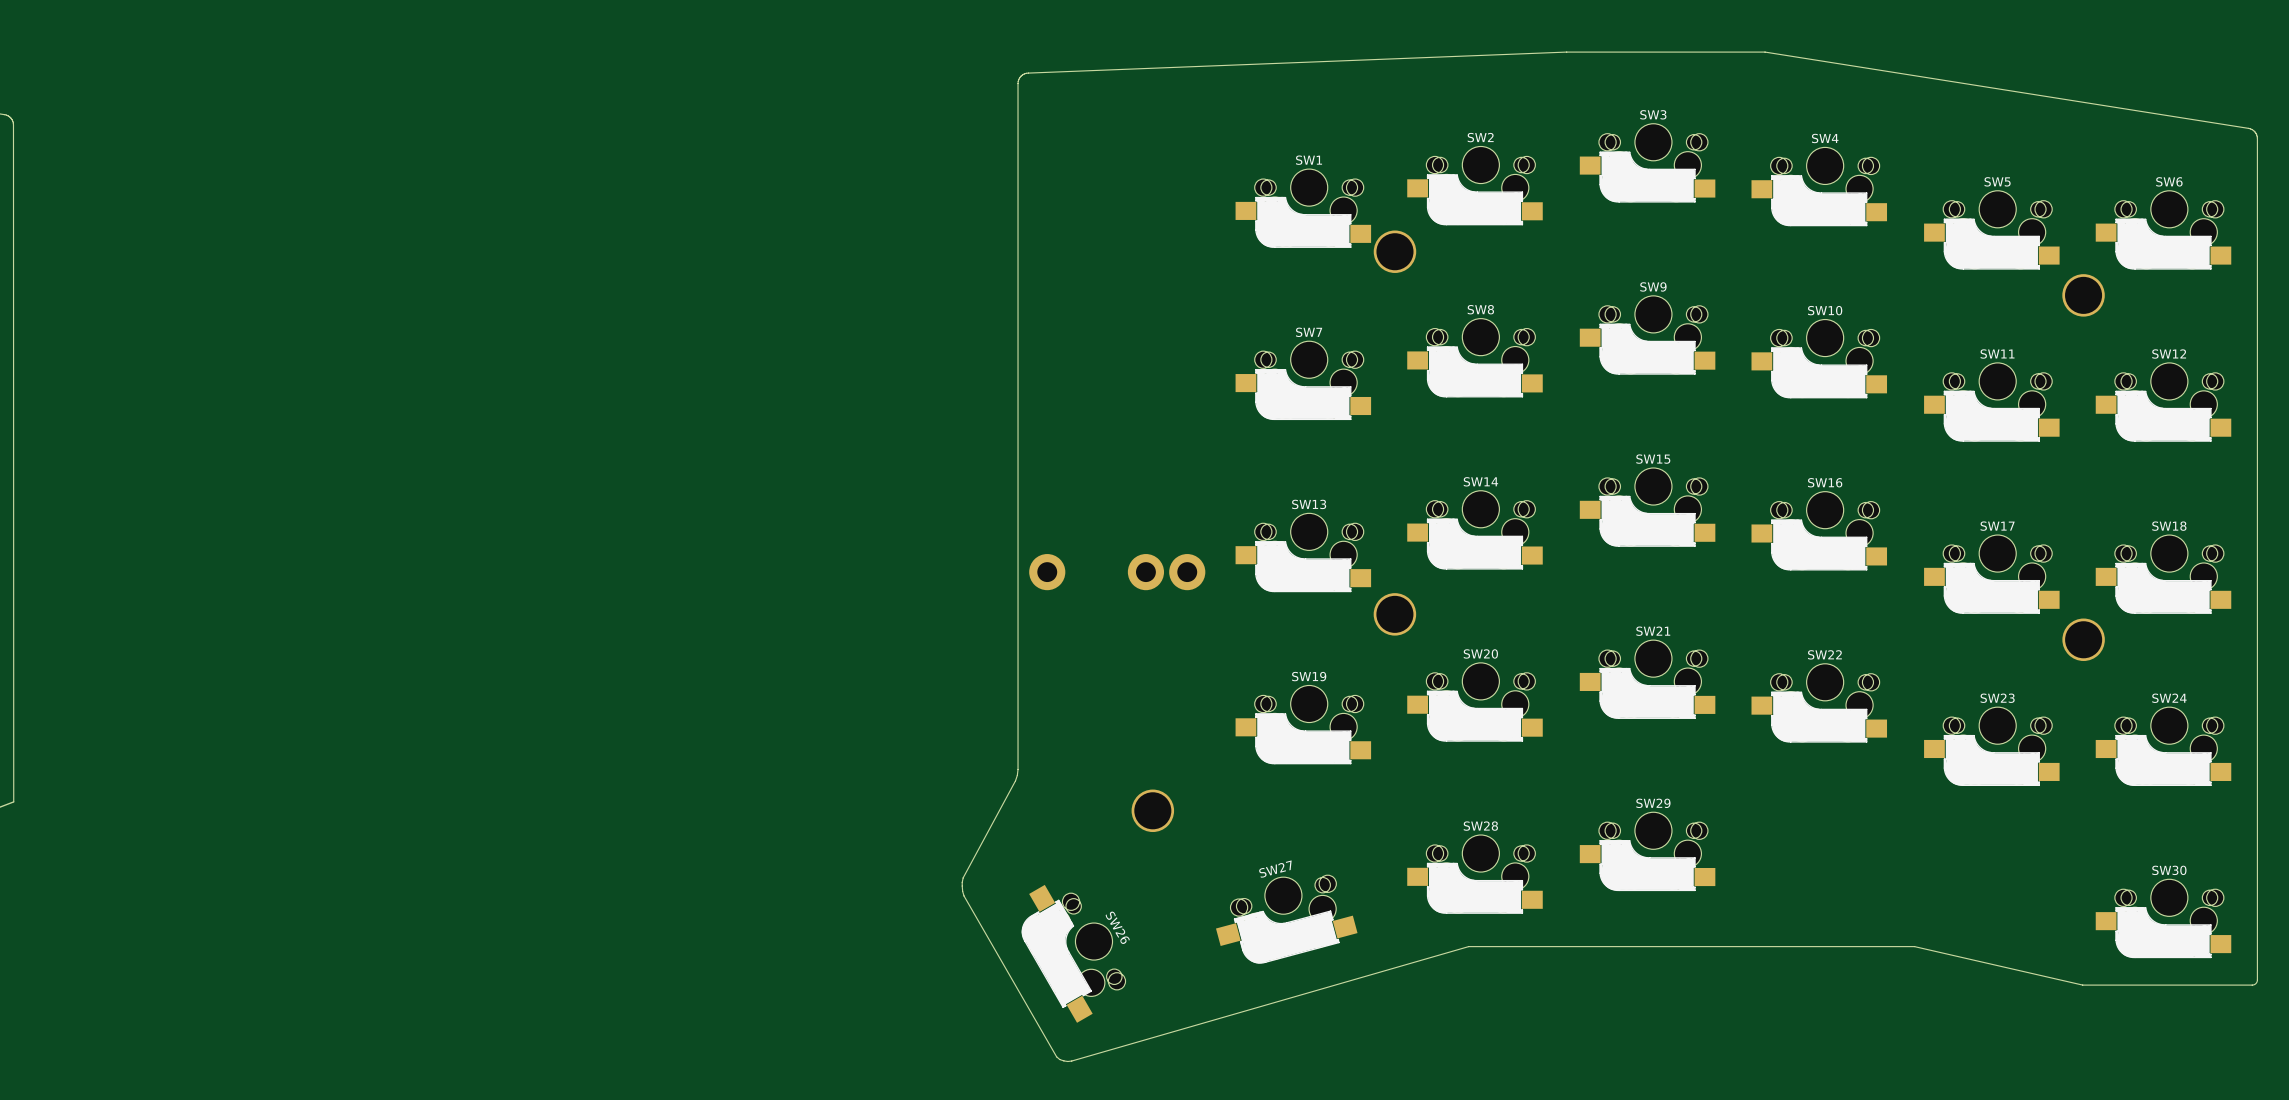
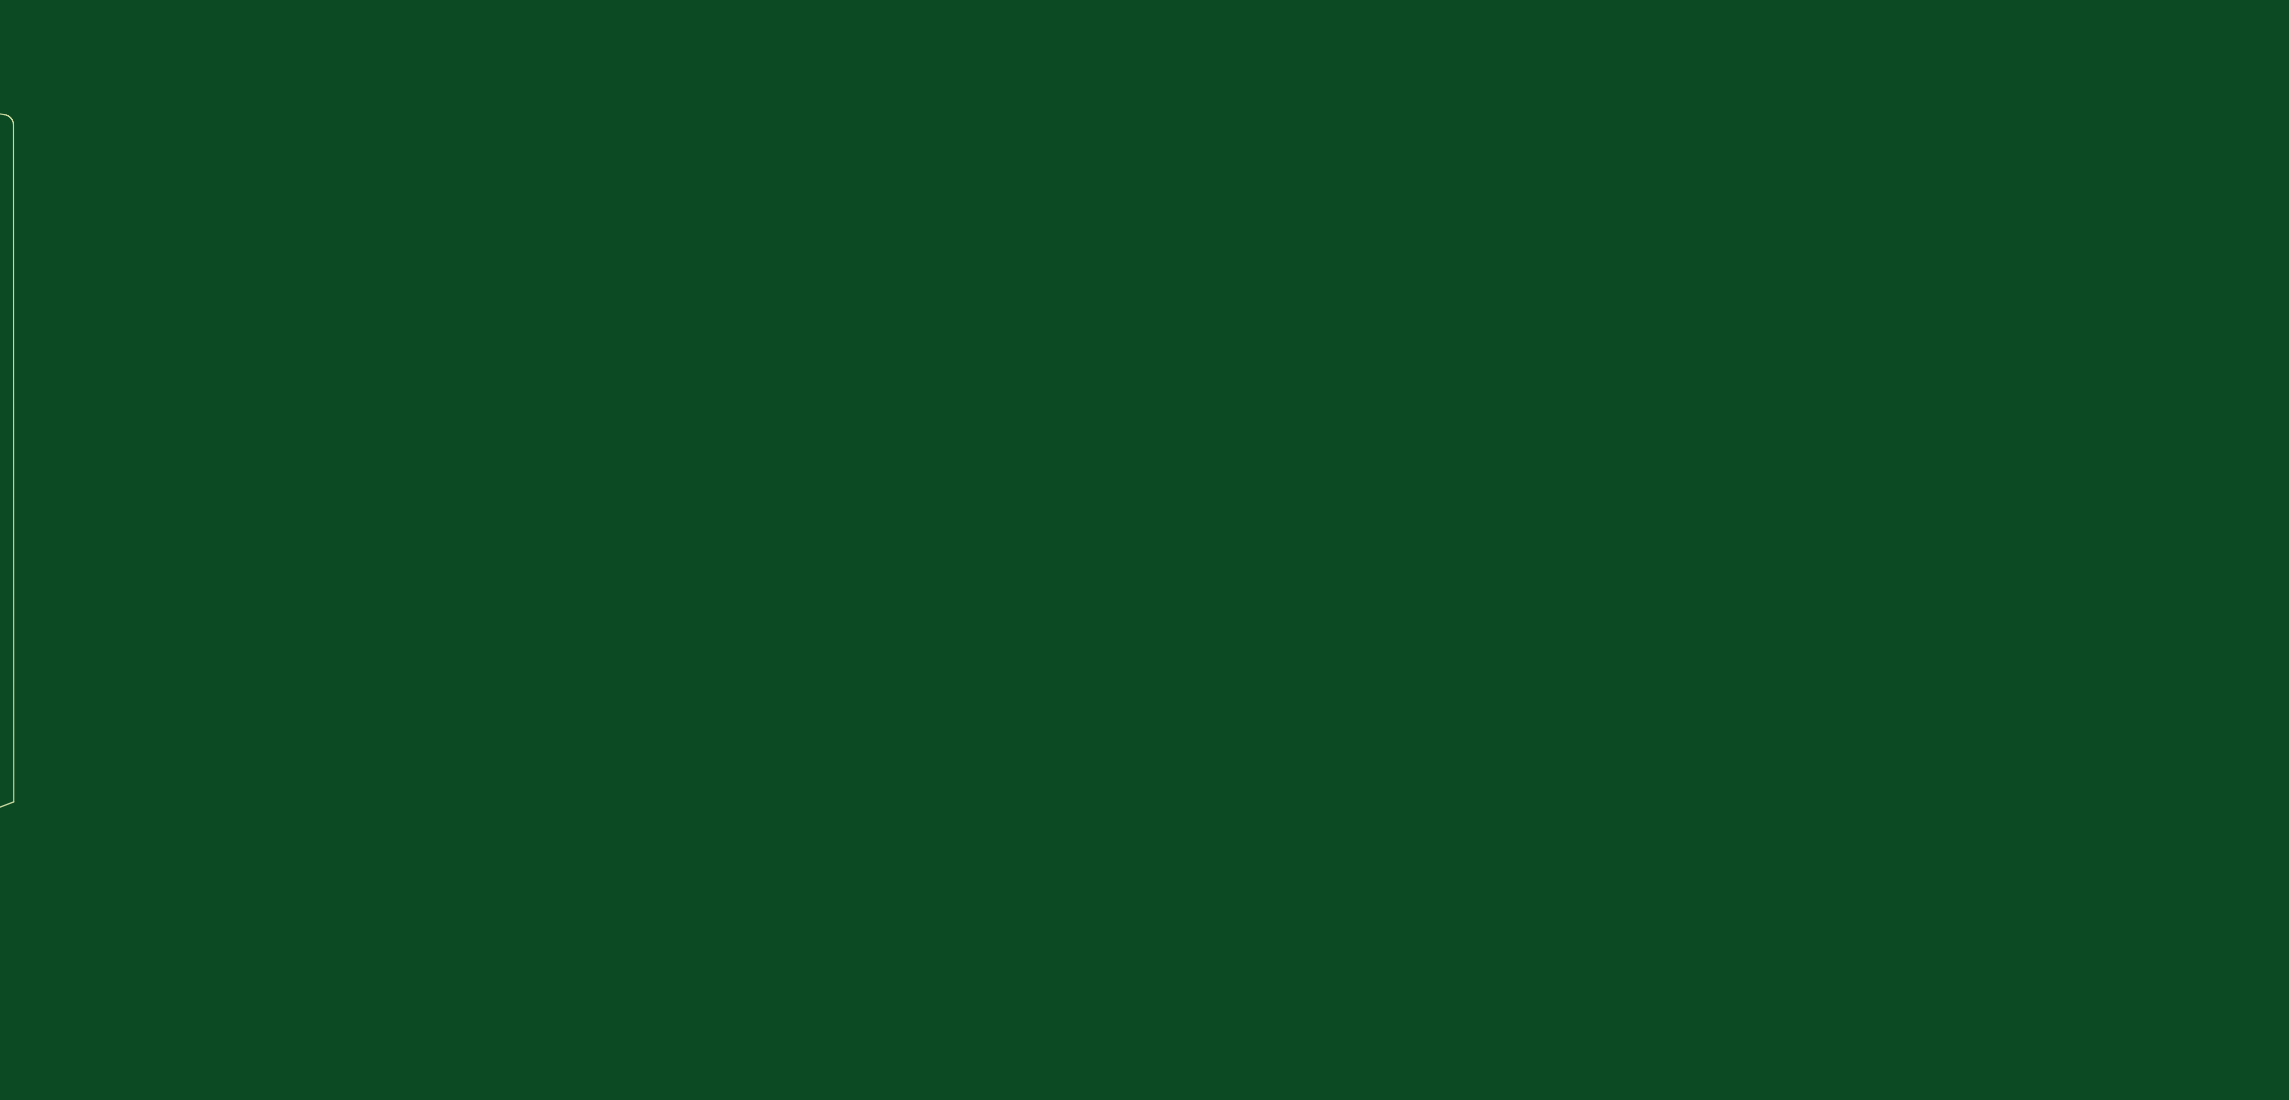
board edge: (1566, 52) (1765, 52) (2248, 128) (2254, 131) (2257, 138) (2257, 979) (2255, 983) (2082, 985) (1914, 946) (1468, 946) (1071, 1061) (1063, 1060) (1056, 1056) (964, 896) (962, 886) (963, 877) (1015, 780) (1018, 769) (1018, 79) (1022, 74) (1028, 73) (1566, 52) -> none
SW3: (1647, 163) -> none
SW2: (1475, 185) -> none
SW4: (1819, 186) -> none
SW1: (1303, 208) -> none
SW5: (1991, 230) -> none
SW6: (2163, 230) -> none
part: (1394, 251) -> none
part: (2083, 295) -> none
SW9: (1647, 335) -> none
SW8: (1475, 358) -> none
SW10: (1819, 358) -> none
SW7: (1303, 380) -> none
SW11: (1991, 402) -> none
SW12: (2163, 402) -> none
SW15: (1647, 507) -> none
SW14: (1475, 530) -> none
SW16: (1819, 531) -> none
SW13: (1303, 552) -> none
part: (1047, 572) -> none
part: (1145, 572) -> none
part: (1187, 572) -> none
SW17: (1991, 574) -> none
SW18: (2163, 574) -> none
part: (1394, 614) -> none
part: (2083, 639) -> none
SW21: (1647, 679) -> none
SW20: (1475, 702) -> none
SW22: (1819, 703) -> none
SW19: (1303, 724) -> none
SW23: (1991, 746) -> none
SW24: (2163, 746) -> none
part: (1152, 810) -> none
SW29: (1647, 851) -> none
SW28: (1475, 874) -> none
SW30: (2163, 918) -> none
SW27: (1286, 919) -> none
SW26: (1073, 953) -> none

